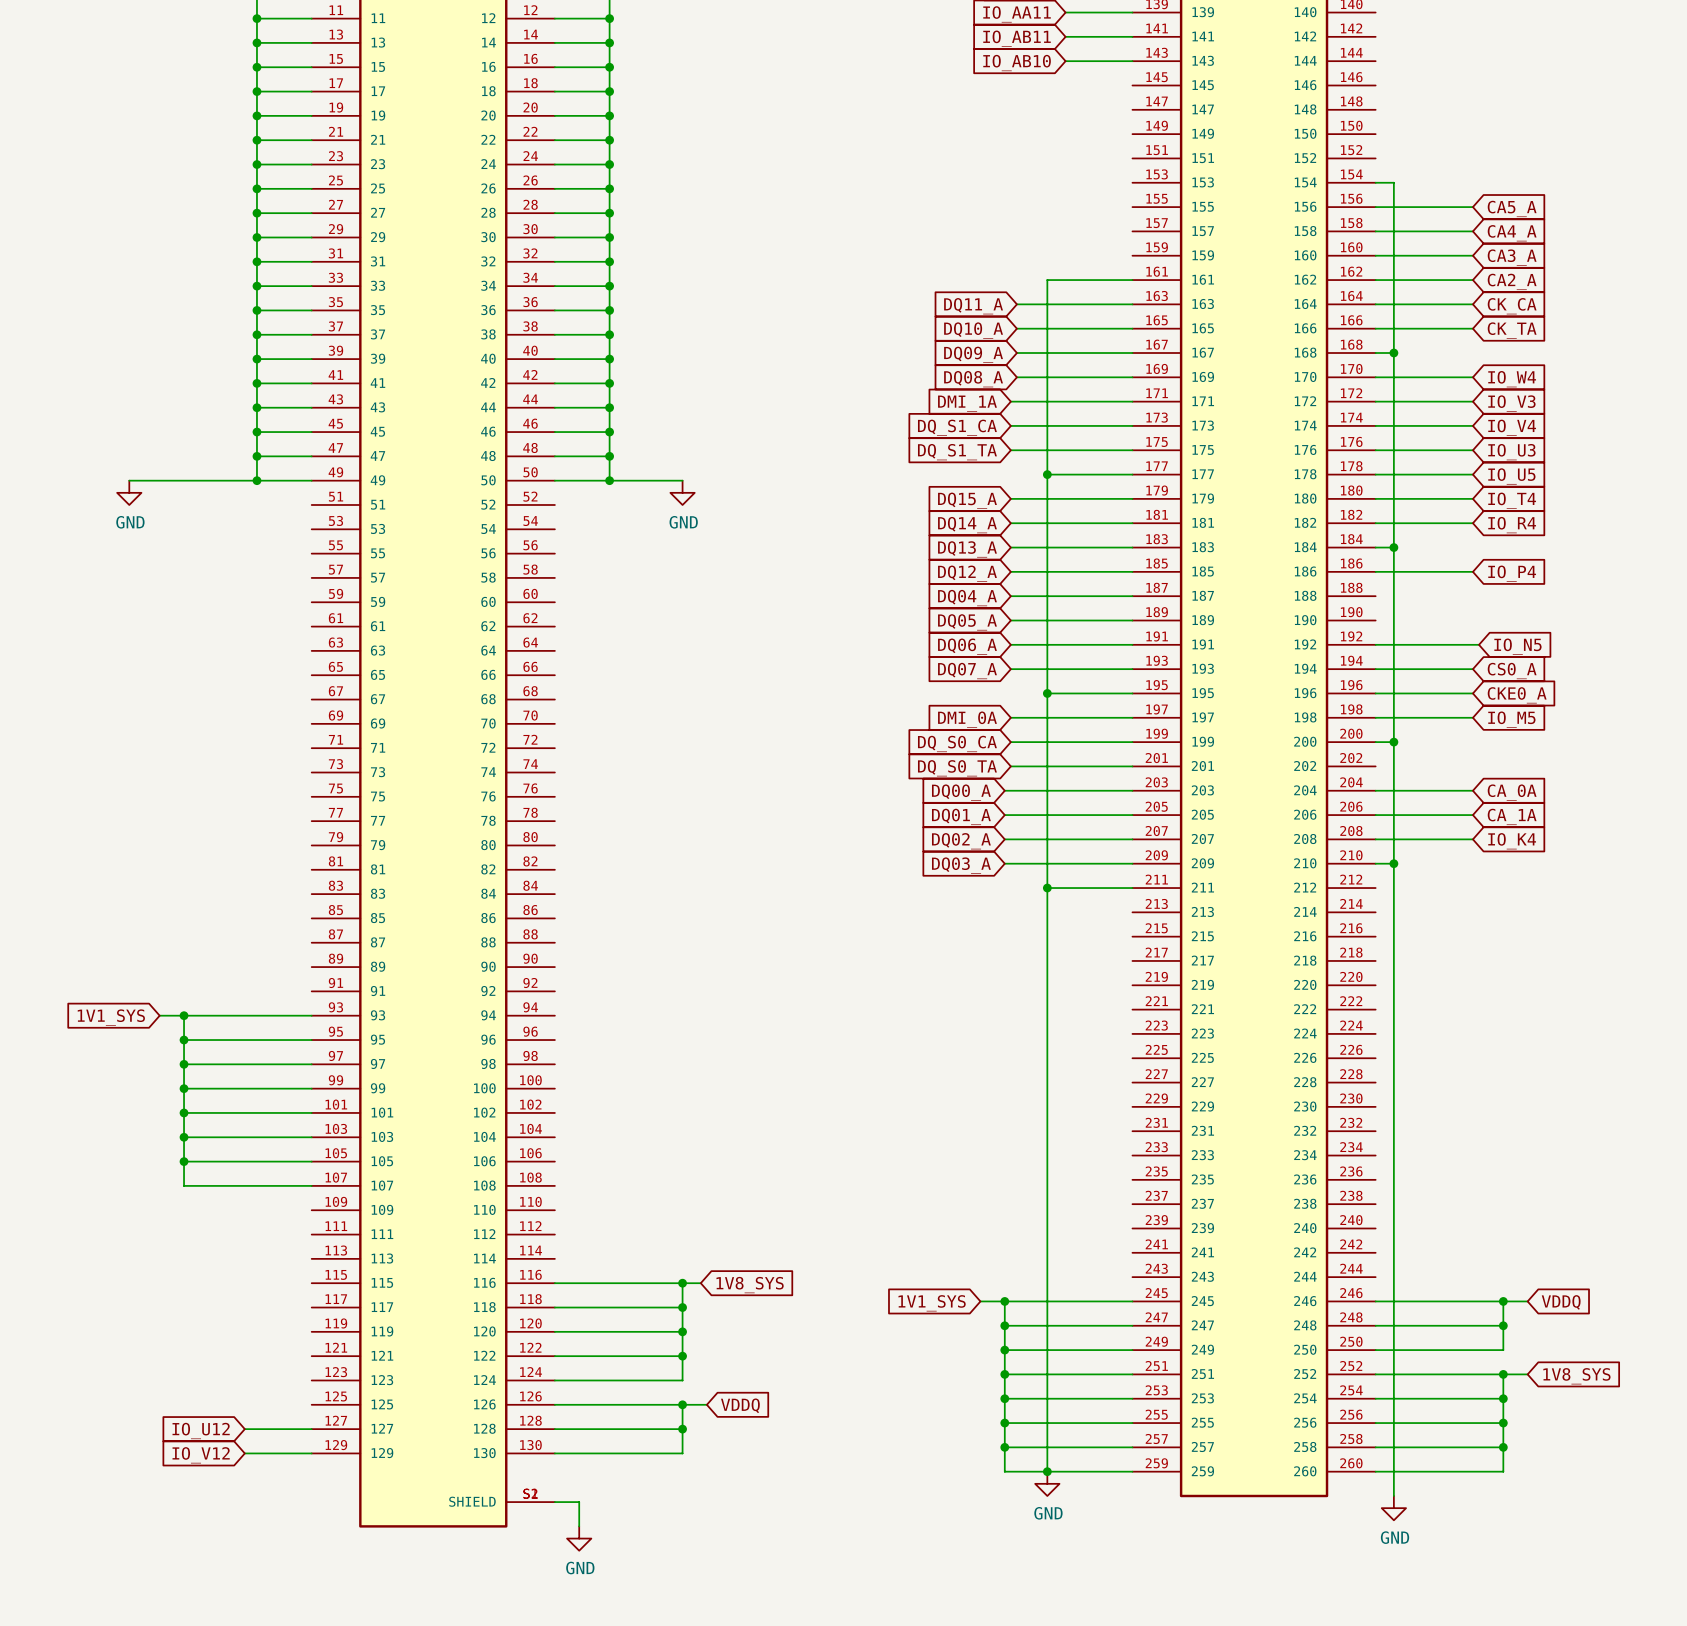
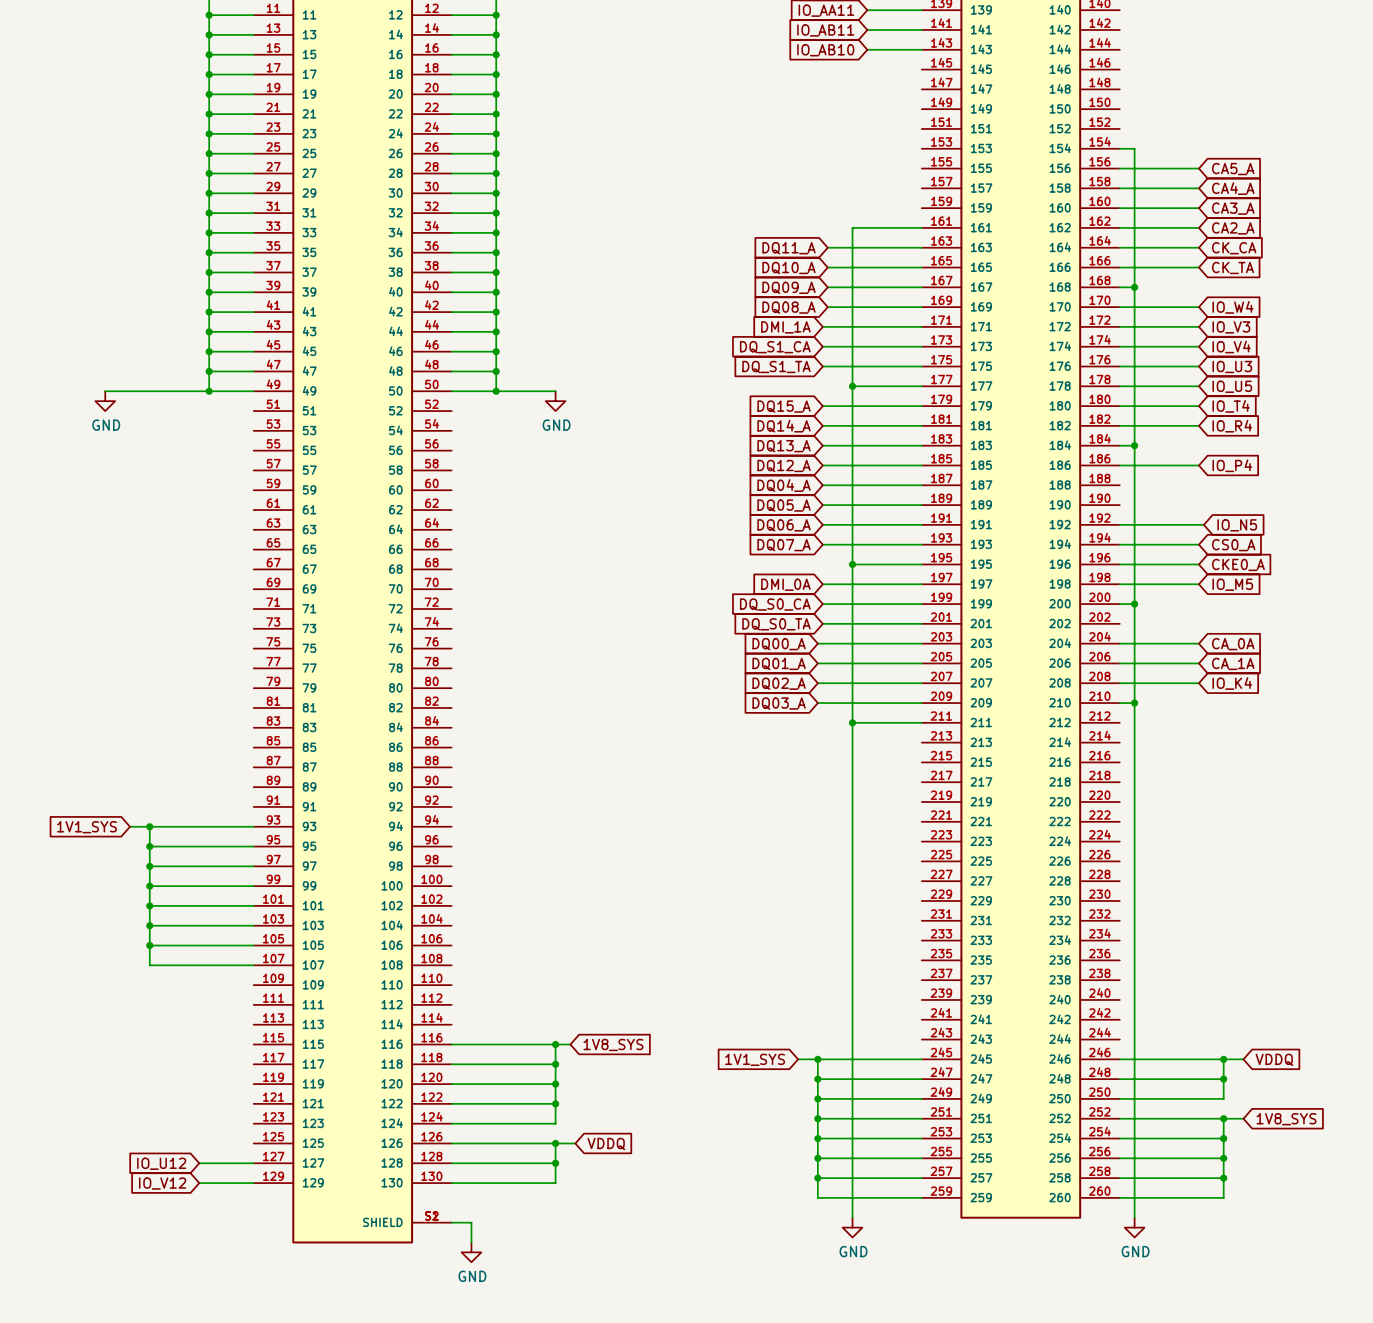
junction: (1047, 1471) -> none
power symbol position: GND (1047, 1483) -> GND (852, 1227)

